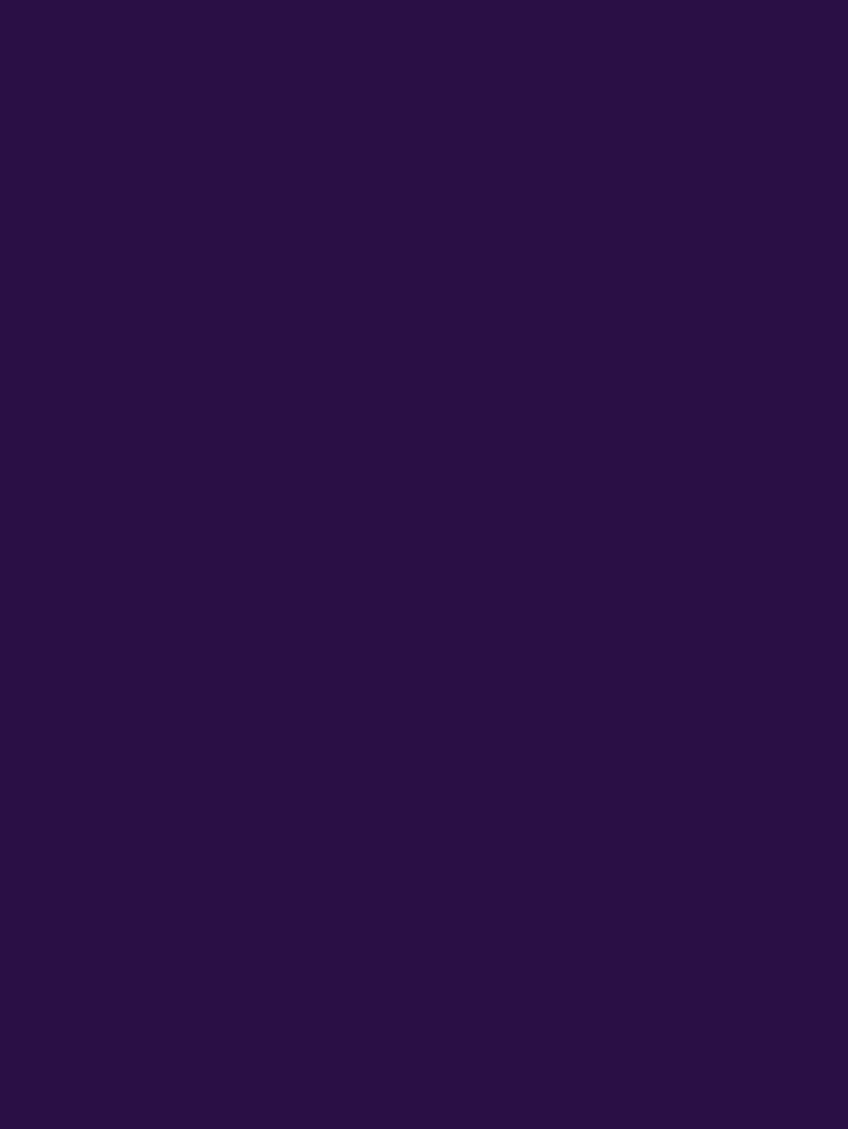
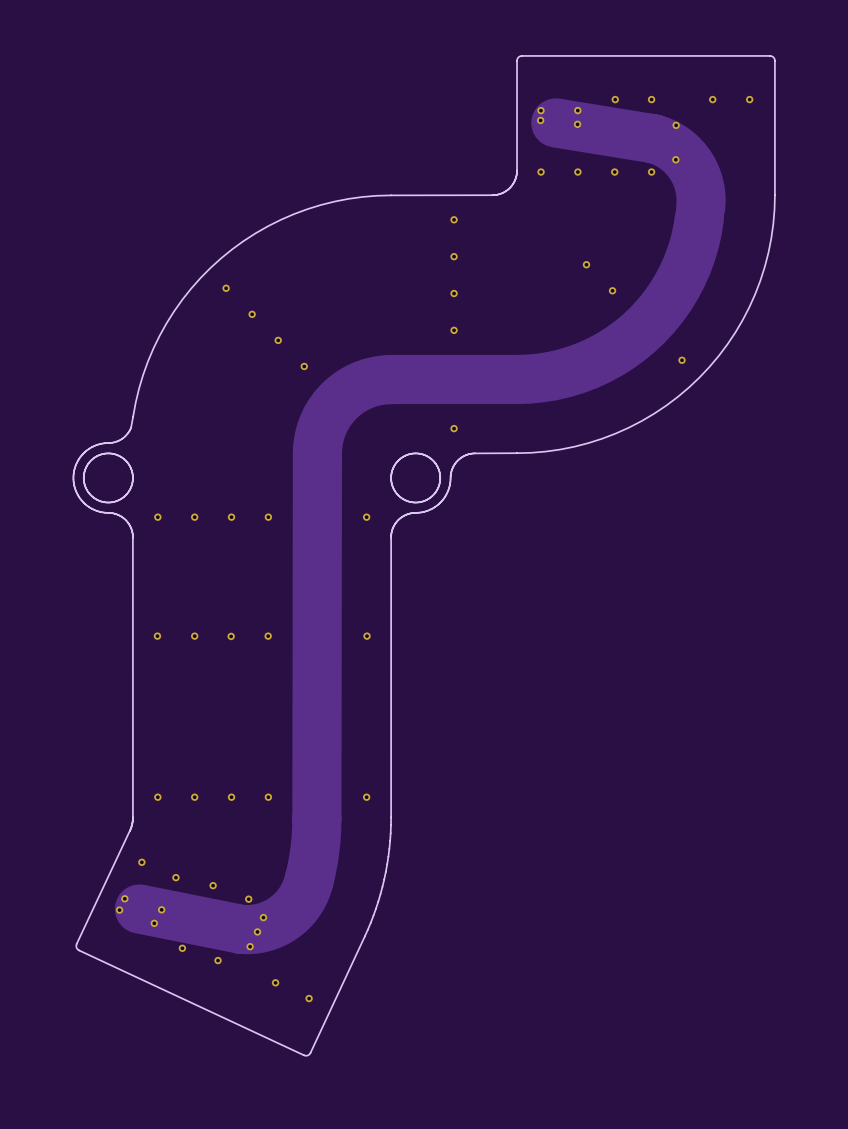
via: none -> (615, 99)
via: none -> (651, 99)
via: none -> (712, 99)
via: none -> (749, 99)
via: none -> (540, 110)
via: none -> (577, 110)
via: none -> (540, 120)
track: none -> (555, 122) (654, 138) (671, 146) (686, 159) (693, 170) (699, 188) (700, 207)
via: none -> (577, 124)
via: none -> (676, 125)
via: none -> (675, 159)
via: none -> (541, 172)
via: none -> (577, 172)
via: none -> (614, 172)
via: none -> (651, 172)
track: none -> (699, 217) (691, 252) (682, 275) (663, 306) (639, 333) (609, 354) (576, 369) (541, 377) (517, 379)
via: none -> (454, 219)
via: none -> (454, 256)
via: none -> (586, 264)
via: none -> (226, 288)
via: none -> (612, 290)
via: none -> (454, 293)
via: none -> (252, 314)
via: none -> (454, 330)
via: none -> (278, 340)
via: none -> (682, 360)
via: none -> (304, 366)
track: none -> (391, 379) (517, 379)
track: none -> (391, 379) (369, 382) (344, 396) (326, 418) (318, 438) (316, 829) (313, 860) (304, 892) (293, 908) (284, 917) (267, 926) (254, 929) (241, 929) (139, 908)
via: none -> (454, 428)
board edge: none -> (108, 443) (120, 439) (130, 429) (139, 388) (147, 361) (159, 335) (174, 311) (191, 288) (210, 267) (232, 249) (255, 233) (280, 219) (307, 209) (348, 198) (391, 195) (493, 195) (508, 188) (514, 181) (516, 173) (517, 60) (519, 56) (770, 55) (774, 58) (774, 195) (771, 238) (760, 280) (749, 307) (735, 332) (718, 356) (688, 387) (666, 405) (641, 421) (615, 433) (588, 443) (560, 449) (531, 452) (473, 453) (463, 456) (453, 467) (448, 489) (440, 502) (427, 510) (403, 515) (393, 526) (391, 537) (390, 825) (387, 864) (380, 894) (370, 922) (308, 1054) (304, 1055) (77, 949) (76, 943) (129, 830)
board edge: none -> (108, 443) (94, 445) (82, 454) (75, 465) (73, 479) (76, 493) (84, 503) (96, 510) (121, 516) (128, 523) (132, 533) (132, 817) (129, 830)
board edge: none -> (107, 453) (97, 455) (90, 461) (85, 469) (83, 479) (86, 488) (91, 496) (99, 501) (109, 502) (118, 500) (126, 494) (131, 486) (132, 476) (130, 467) (124, 459) (116, 454) (107, 453)
board edge: none -> (414, 453) (405, 455) (397, 461) (392, 469) (391, 479) (393, 488) (399, 496) (407, 501) (416, 502) (426, 500) (433, 494) (438, 486) (440, 476) (437, 467) (432, 459) (424, 454) (414, 453)
via: none -> (157, 517)
via: none -> (194, 517)
via: none -> (231, 517)
via: none -> (268, 517)
via: none -> (366, 517)
via: none -> (157, 636)
via: none -> (194, 636)
via: none -> (231, 636)
via: none -> (268, 636)
via: none -> (367, 636)
via: none -> (157, 797)
via: none -> (194, 797)
via: none -> (231, 797)
via: none -> (268, 797)
via: none -> (366, 797)
via: none -> (141, 862)
via: none -> (175, 877)
via: none -> (213, 885)
via: none -> (124, 898)
via: none -> (248, 899)
via: none -> (161, 909)
via: none -> (119, 910)
via: none -> (263, 917)
via: none -> (154, 923)
via: none -> (257, 931)
via: none -> (250, 946)
via: none -> (182, 948)
via: none -> (218, 960)
via: none -> (275, 982)
via: none -> (309, 998)

